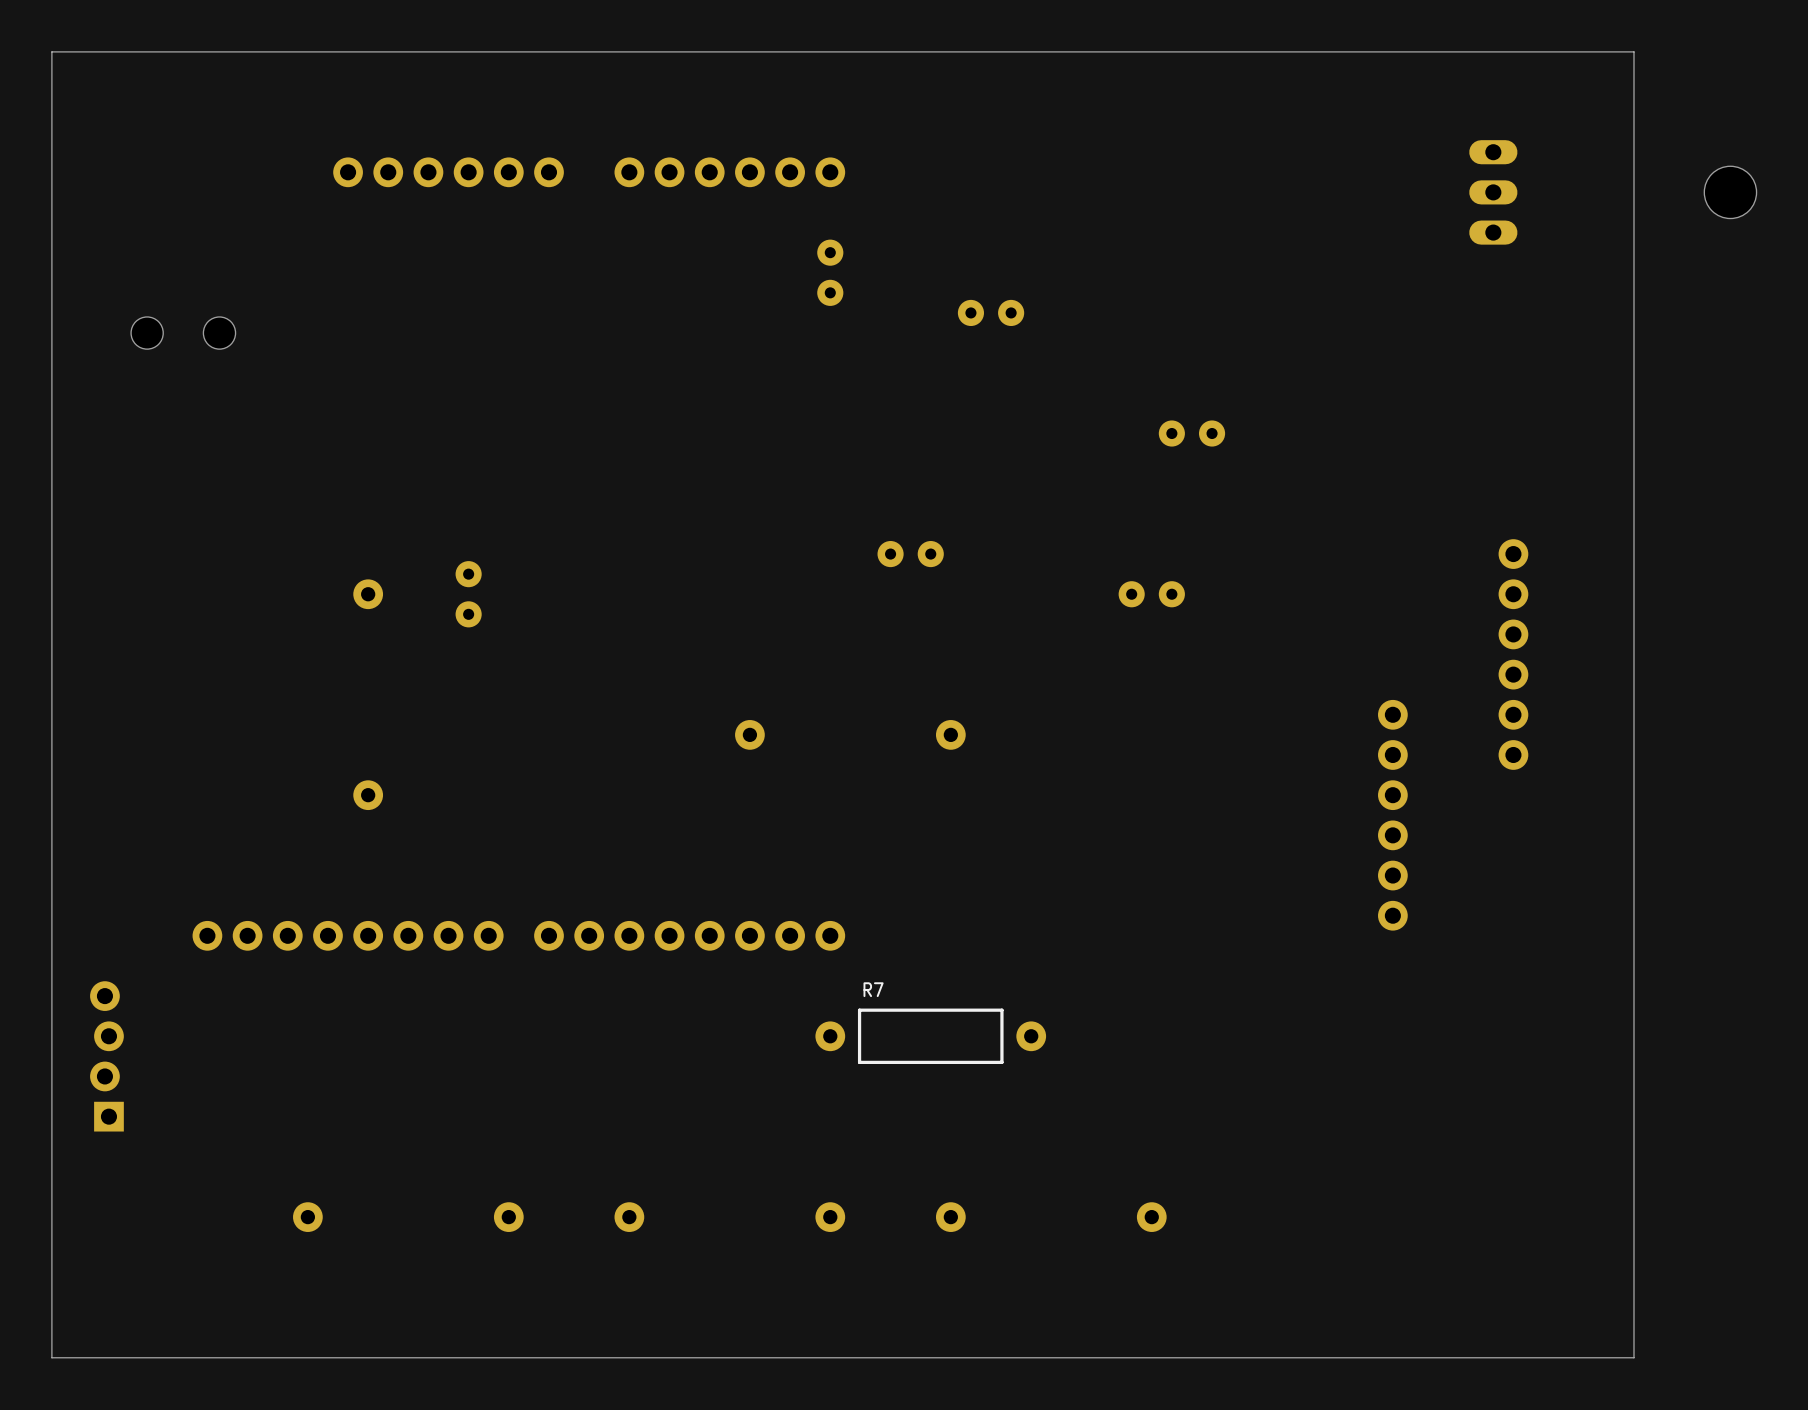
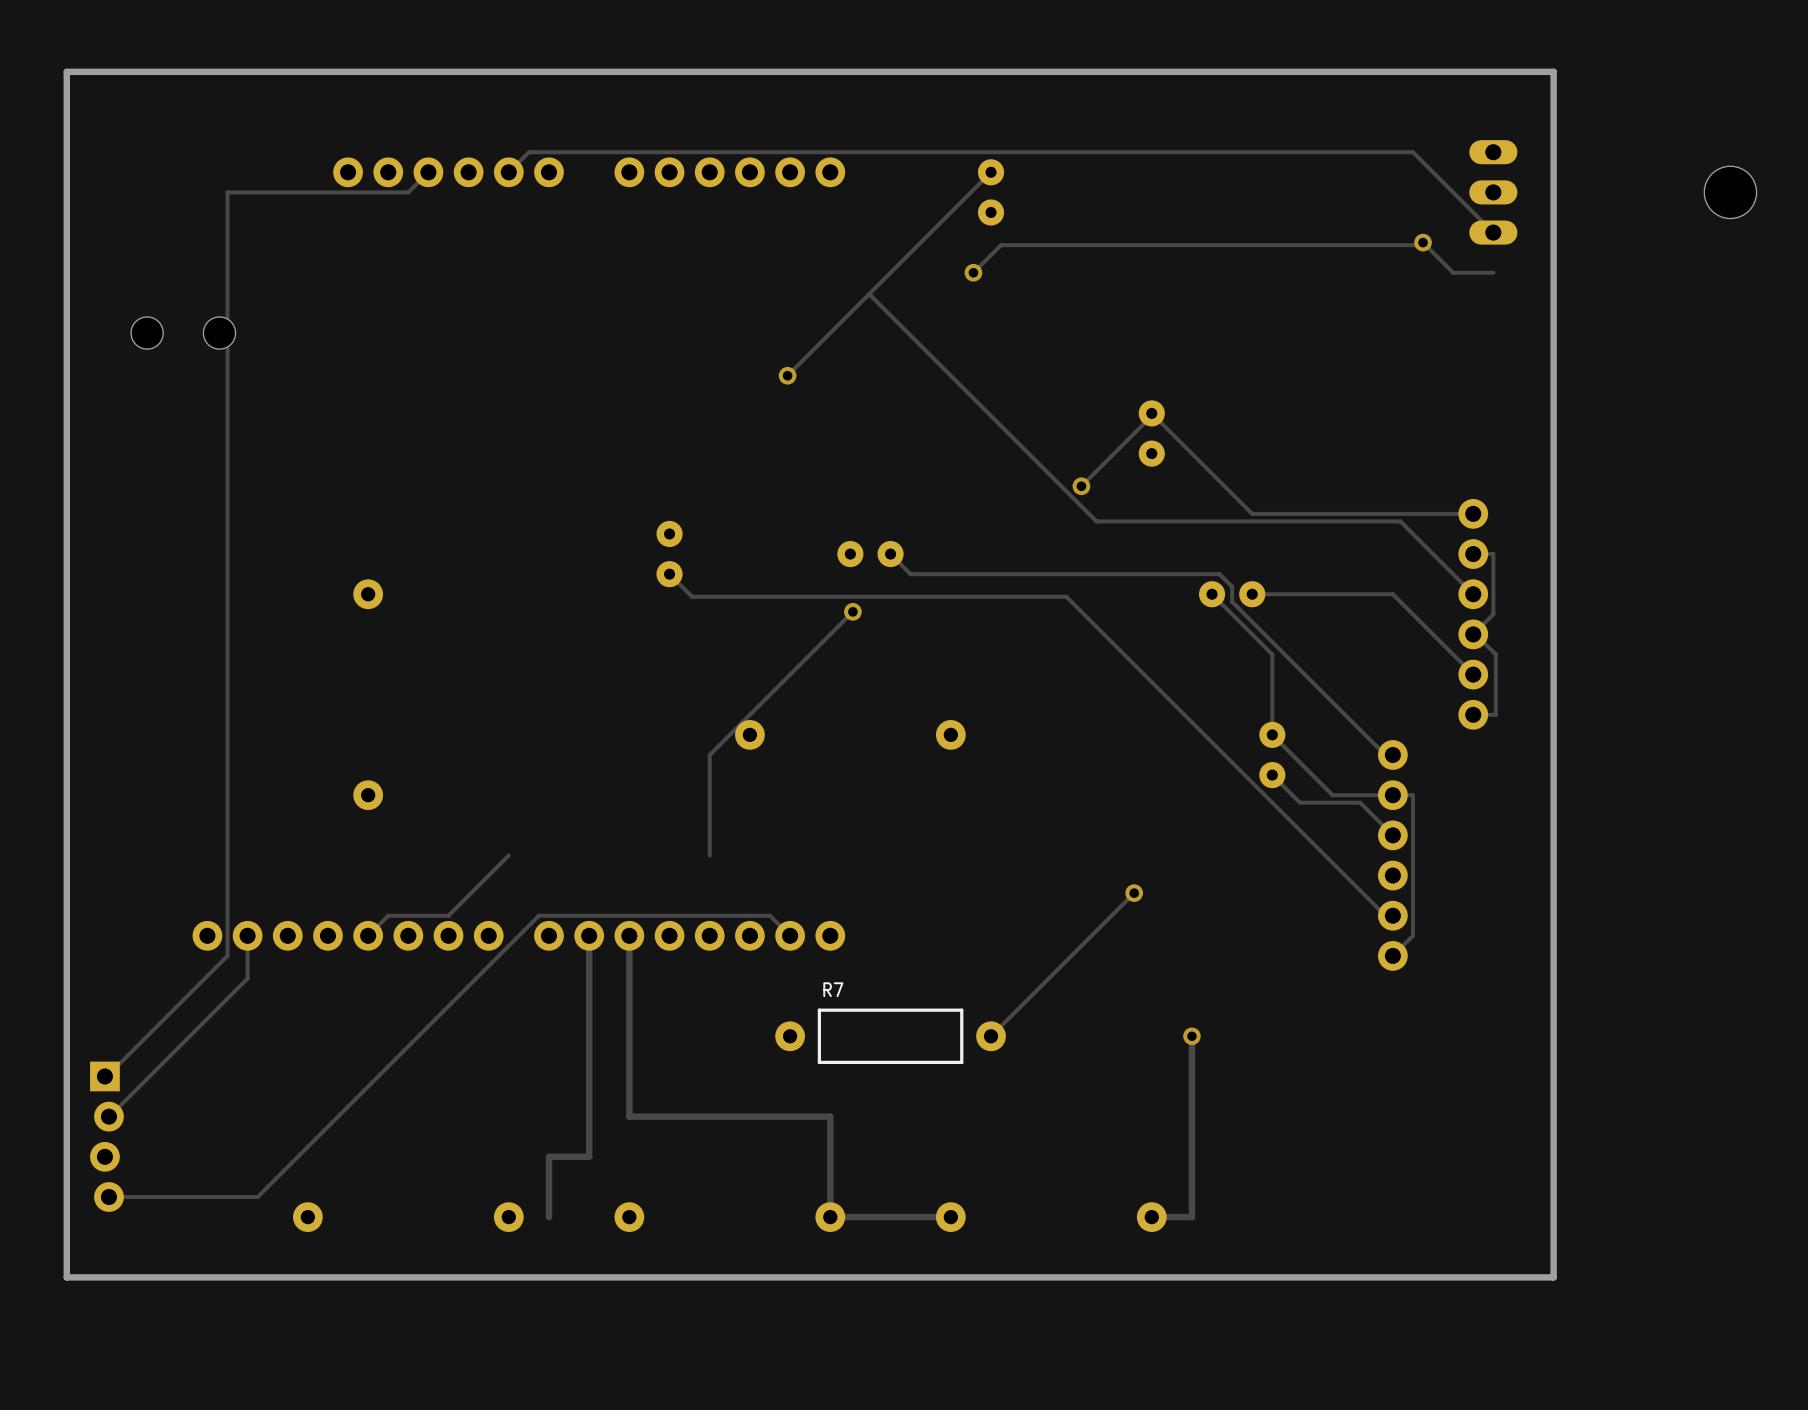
board edge: (1633, 51) (51, 51) (51, 1357) (1633, 1357) (1633, 51) -> (1553, 71) (1553, 1277) (66, 1277) (66, 71) (1553, 71)
track: none -> (428, 172) (408, 192) (227, 192) (227, 955) (104, 1076)
track: none -> (508, 172) (528, 152) (1412, 152) (1493, 232)
track: none -> (991, 172) (787, 375)
part: none -> (991, 192)
via: none -> (1423, 242)
part: (830, 272) -> none
via: none -> (973, 272)
track: none -> (1493, 272) (1453, 272) (1423, 242) (1423, 245) (1001, 245) (973, 272)
track: none -> (869, 294) (1096, 521) (1400, 521) (1473, 594)
part: (991, 312) -> none
via: none -> (787, 375)
part rotation: 0° (1191, 433) -> 90° clockwise (1151, 433)
part position: (1191, 433) -> (1151, 433)
track: none -> (1081, 486) (1151, 415) (1151, 413) (1252, 513) (1473, 513)
via: none -> (1081, 486)
part: none -> (669, 554)
track: none -> (890, 554) (910, 574) (1219, 574) (1232, 586) (1232, 601) (1385, 754) (1392, 754)
part position: (910, 554) -> (870, 554)
track: none -> (1473, 554) (1493, 554) (1493, 614) (1473, 634) (1475, 634) (1495, 654) (1495, 714) (1473, 714)
track: none -> (669, 574) (692, 596) (1066, 596) (1385, 915) (1392, 915)
part: (468, 594) -> none
part: (1151, 594) -> none
track: none -> (1212, 594) (1272, 654) (1272, 734) (1332, 795) (1412, 795) (1412, 935) (1392, 955)
part: none -> (1232, 594)
track: none -> (1252, 594) (1392, 594) (1473, 674)
track: none -> (852, 611) (709, 754) (709, 855)
via: none -> (852, 611)
part position: (1513, 654) -> (1473, 614)
part: none -> (1272, 754)
track: none -> (1272, 775) (1299, 802) (1360, 802) (1392, 835)
part position: (1392, 815) -> (1392, 855)
track: none -> (508, 855) (448, 915) (388, 915) (368, 935)
track: none -> (1134, 893) (991, 1036)
via: none -> (1134, 893)
track: none -> (247, 935) (247, 978) (108, 1116)
track: none -> (589, 935) (589, 1156) (549, 1156) (549, 1217)
track: none -> (629, 935) (629, 1116) (830, 1116) (830, 1217) (950, 1217)
track: none -> (790, 935) (770, 915) (538, 915) (257, 1197) (108, 1197)
R7 position: (930, 1036) -> (890, 1036)
track: none -> (1191, 1036) (1191, 1217) (1151, 1217)
via: none -> (1191, 1036)
part rotation: 0° (106, 1056) -> 180° (106, 1136)

